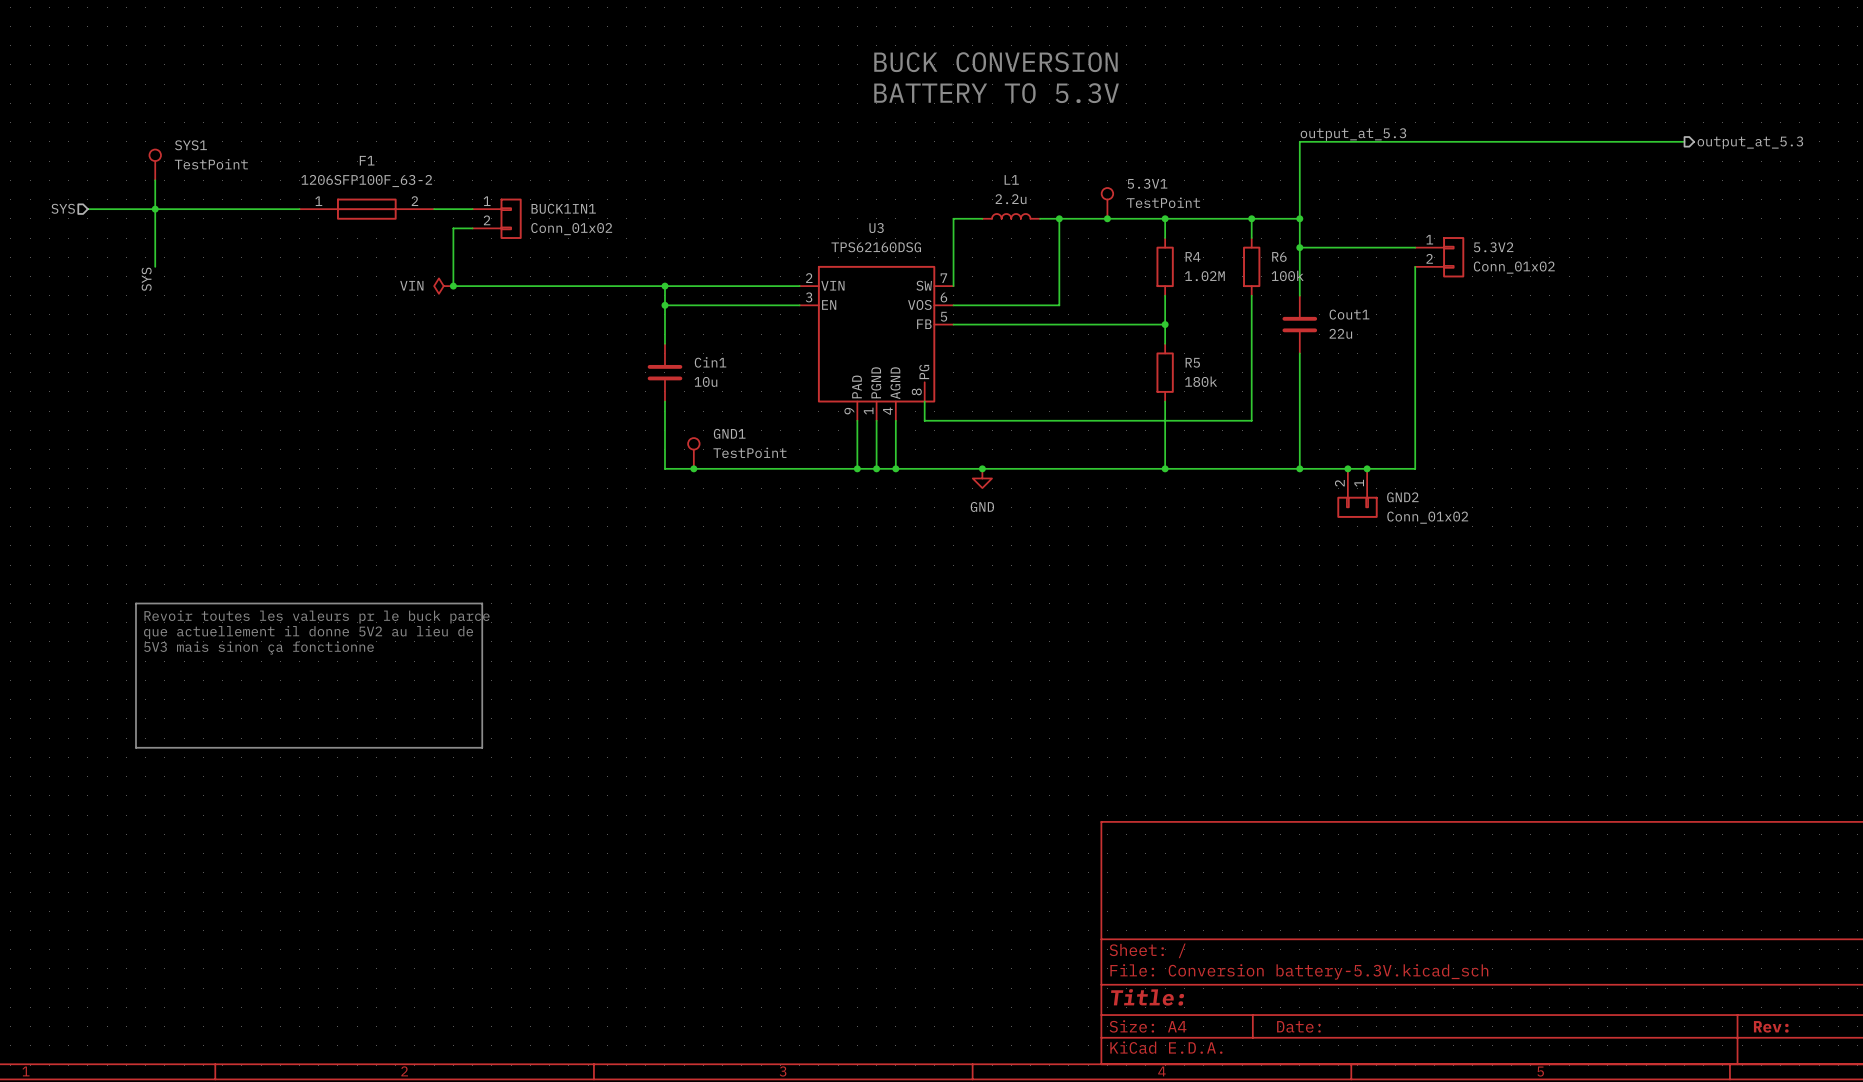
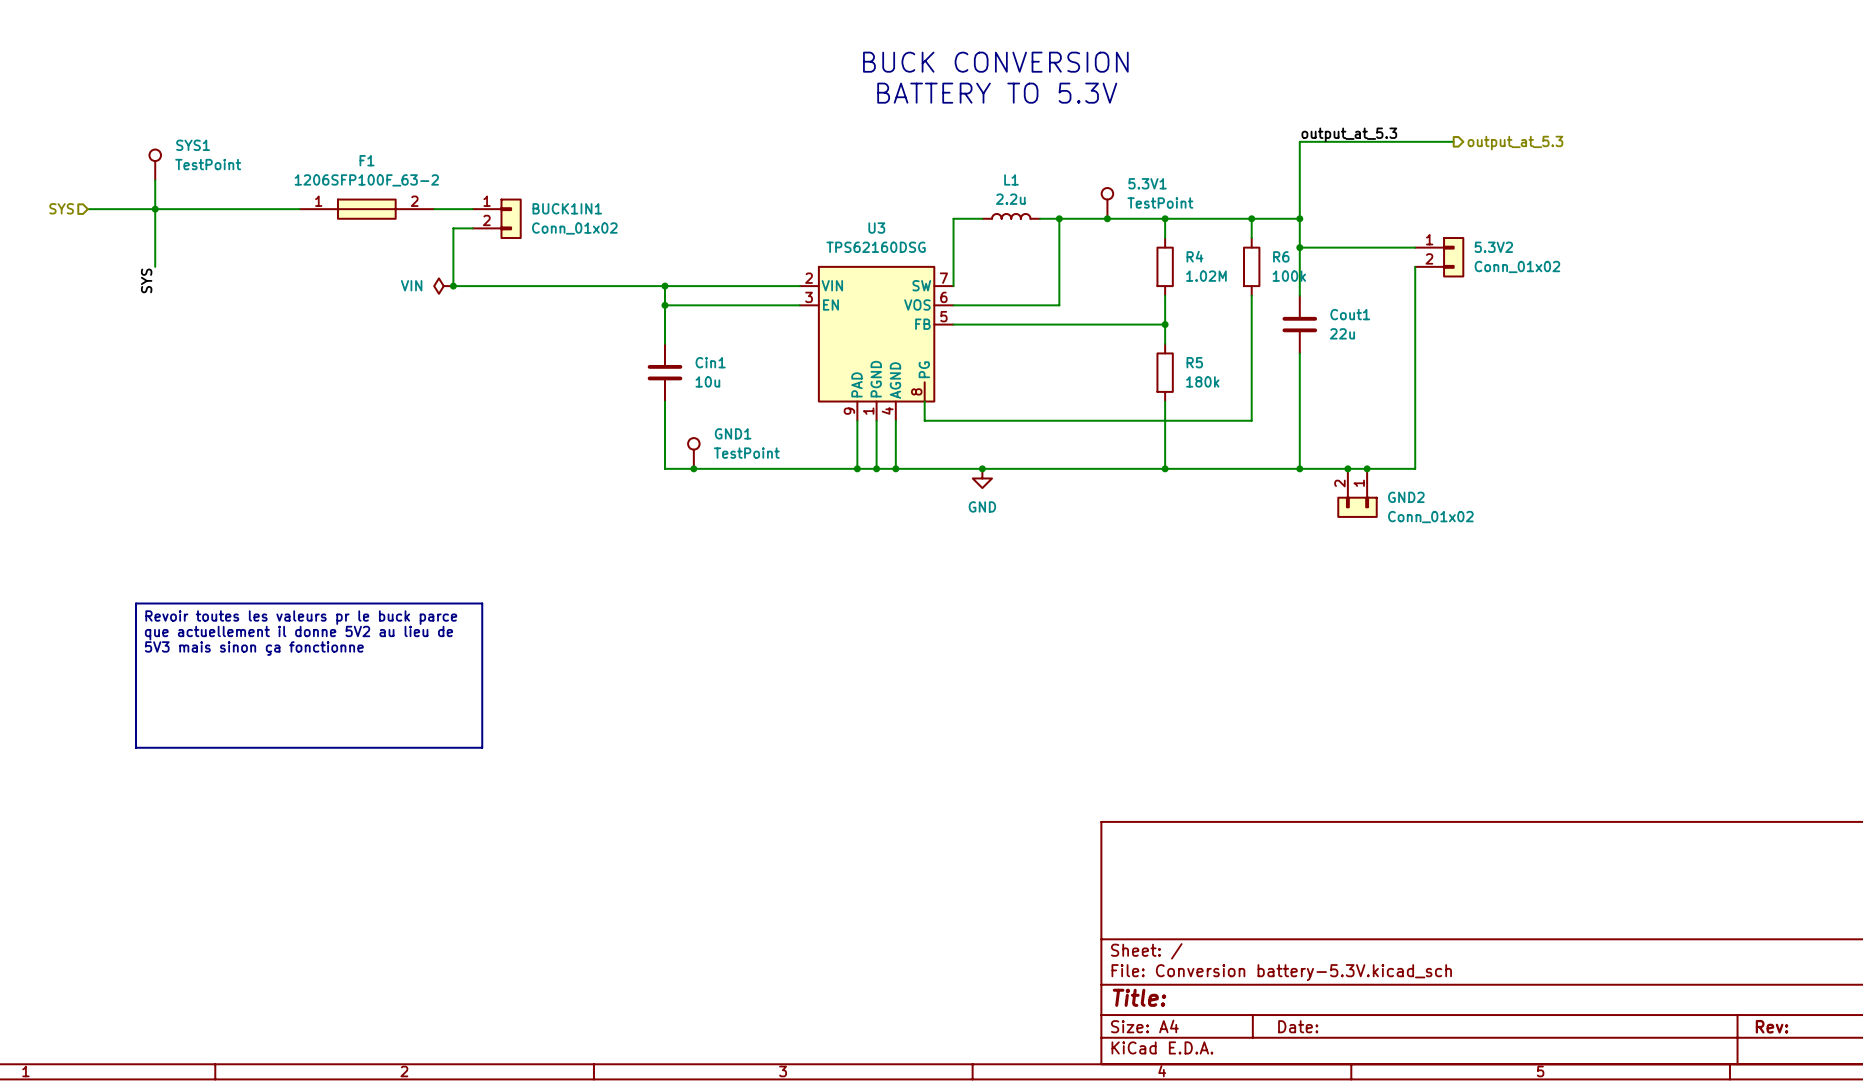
wire: (1453, 141) (1684, 141) -> none
hierarchical label: none -> output_at_5.3 (1515, 143)
hierarchical label: output_at_5.3 (1750, 142) -> none

